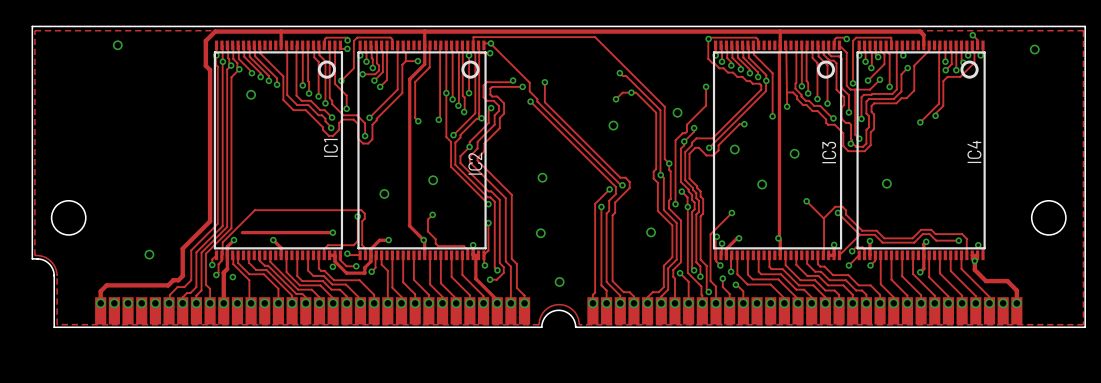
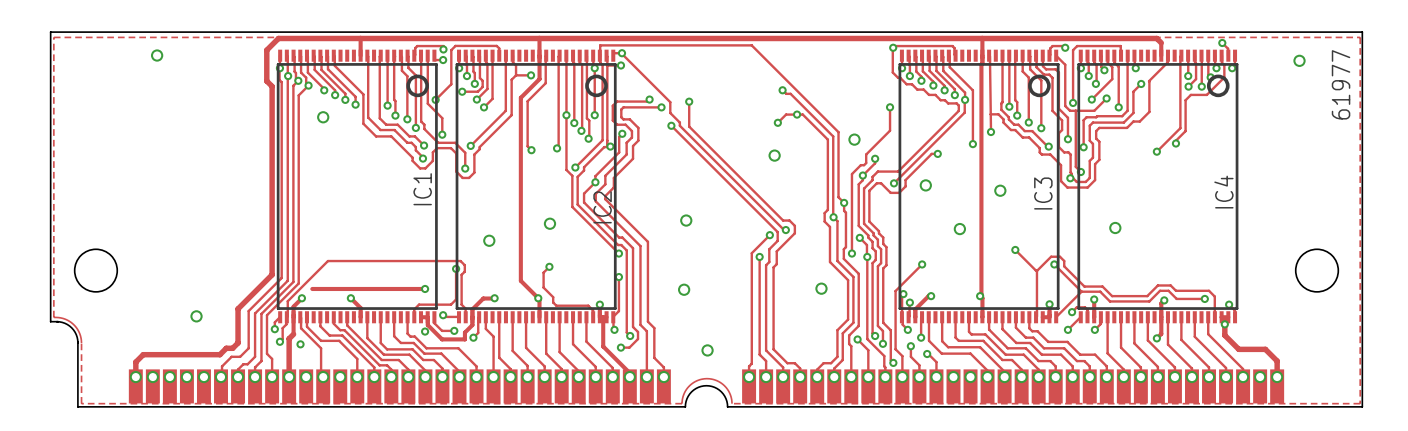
text: none -> 61977 (1341, 84)

